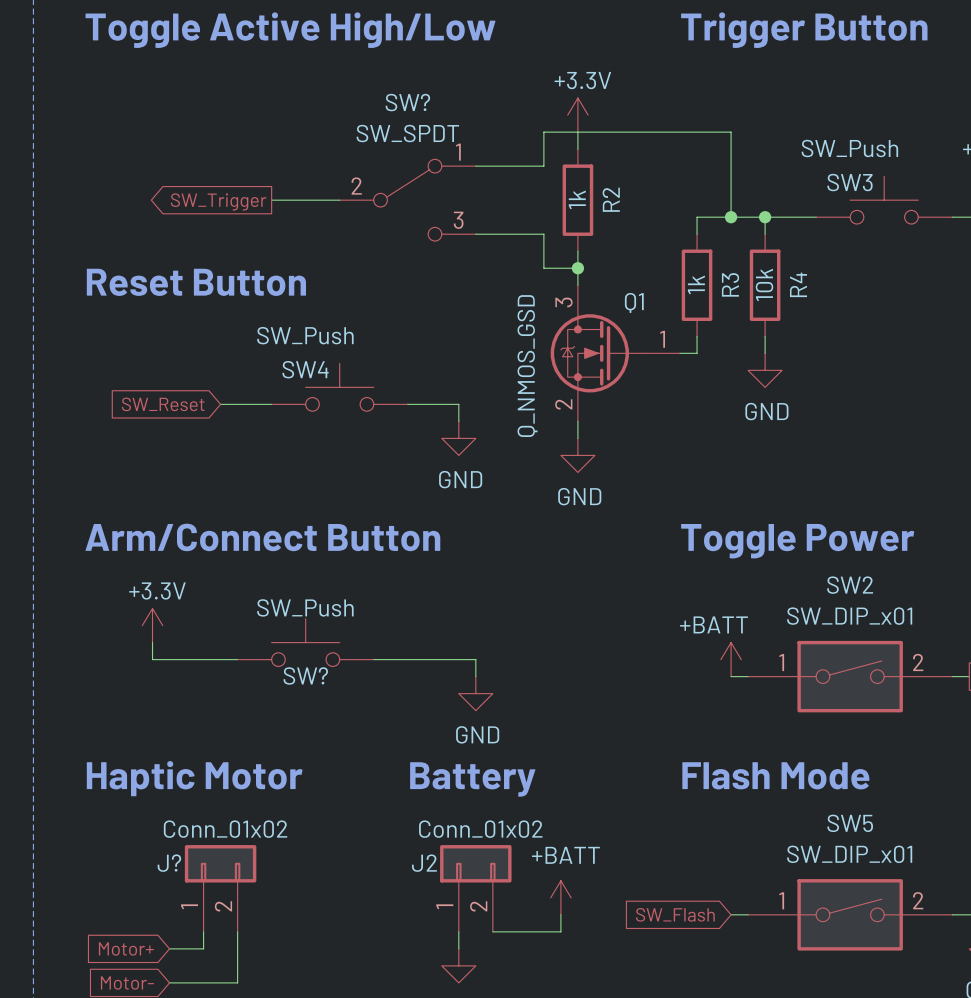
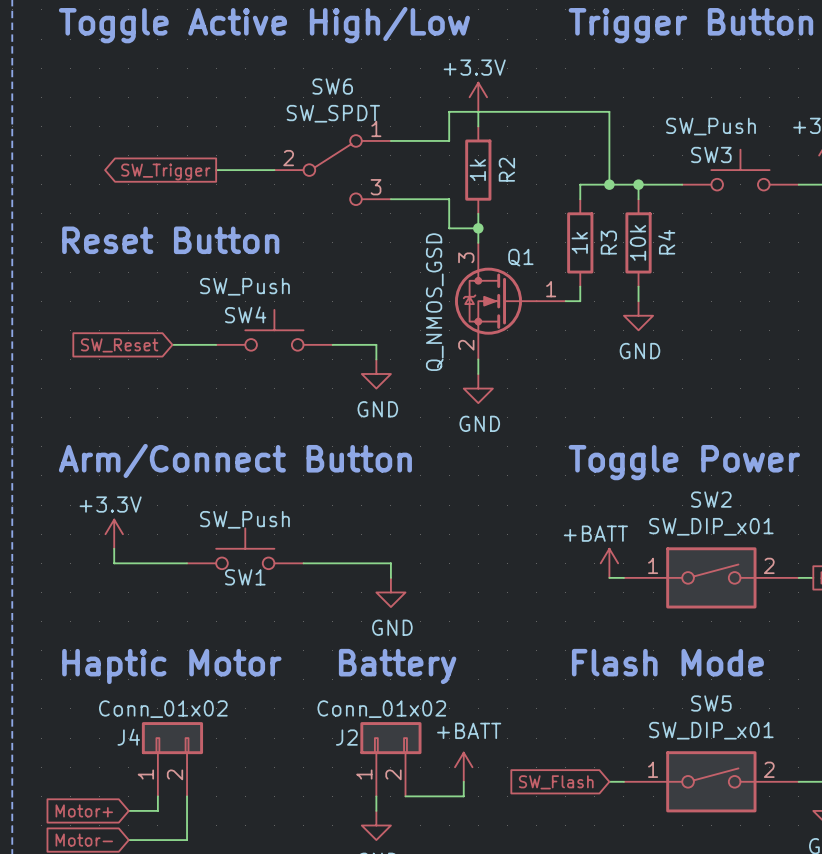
SW? name: SW? (407, 102) -> SW6 (332, 86)
SW? name: SW? (305, 675) -> SW1 (245, 577)
J? name: J? (169, 863) -> J4 (128, 737)

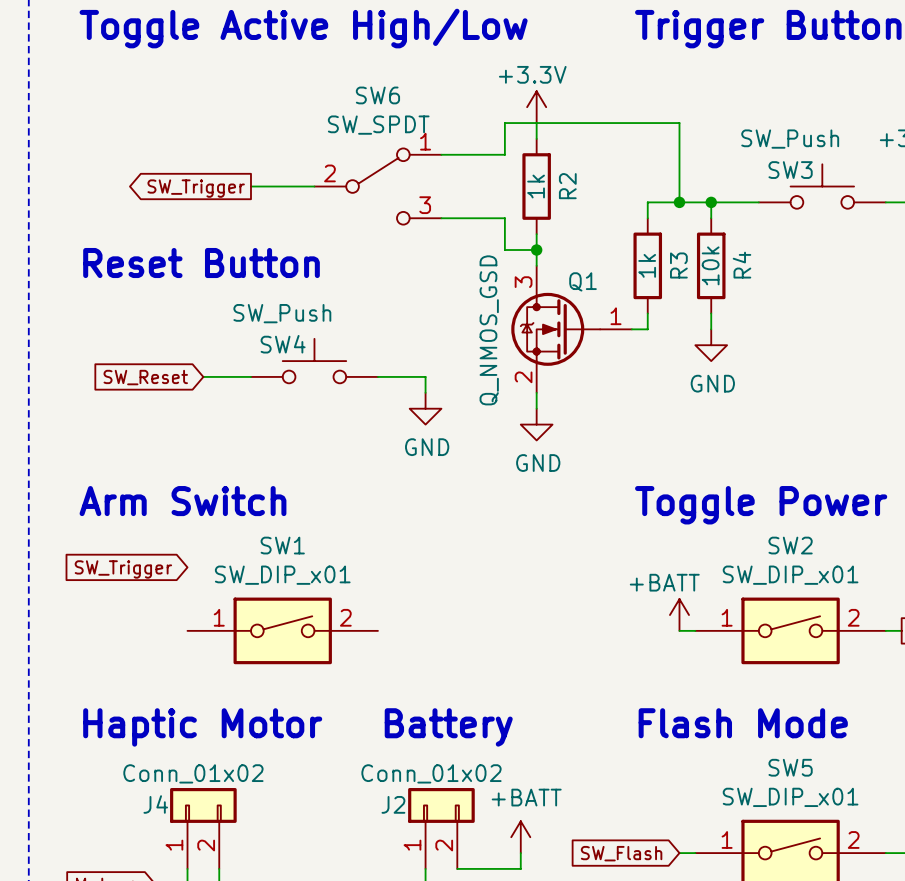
text: Arm/Connect Button (235, 460) -> Arm Switch (183, 501)
SW1 value: SW_Push (244, 519) -> SW_DIP_x01 (282, 575)
global label: none -> SW_Trigger (123, 569)
SW1 symbol: [187, 528, 304, 570] -> [187, 597, 378, 665]
power symbol: +3.3V (114, 534) -> none
wire: (114, 548) (114, 563) (187, 563) -> none
wire: (303, 563) (390, 563) (390, 577) -> none
SW1 name position: SW1 (245, 577) -> SW1 (282, 545)
power symbol: GND (390, 592) -> none

